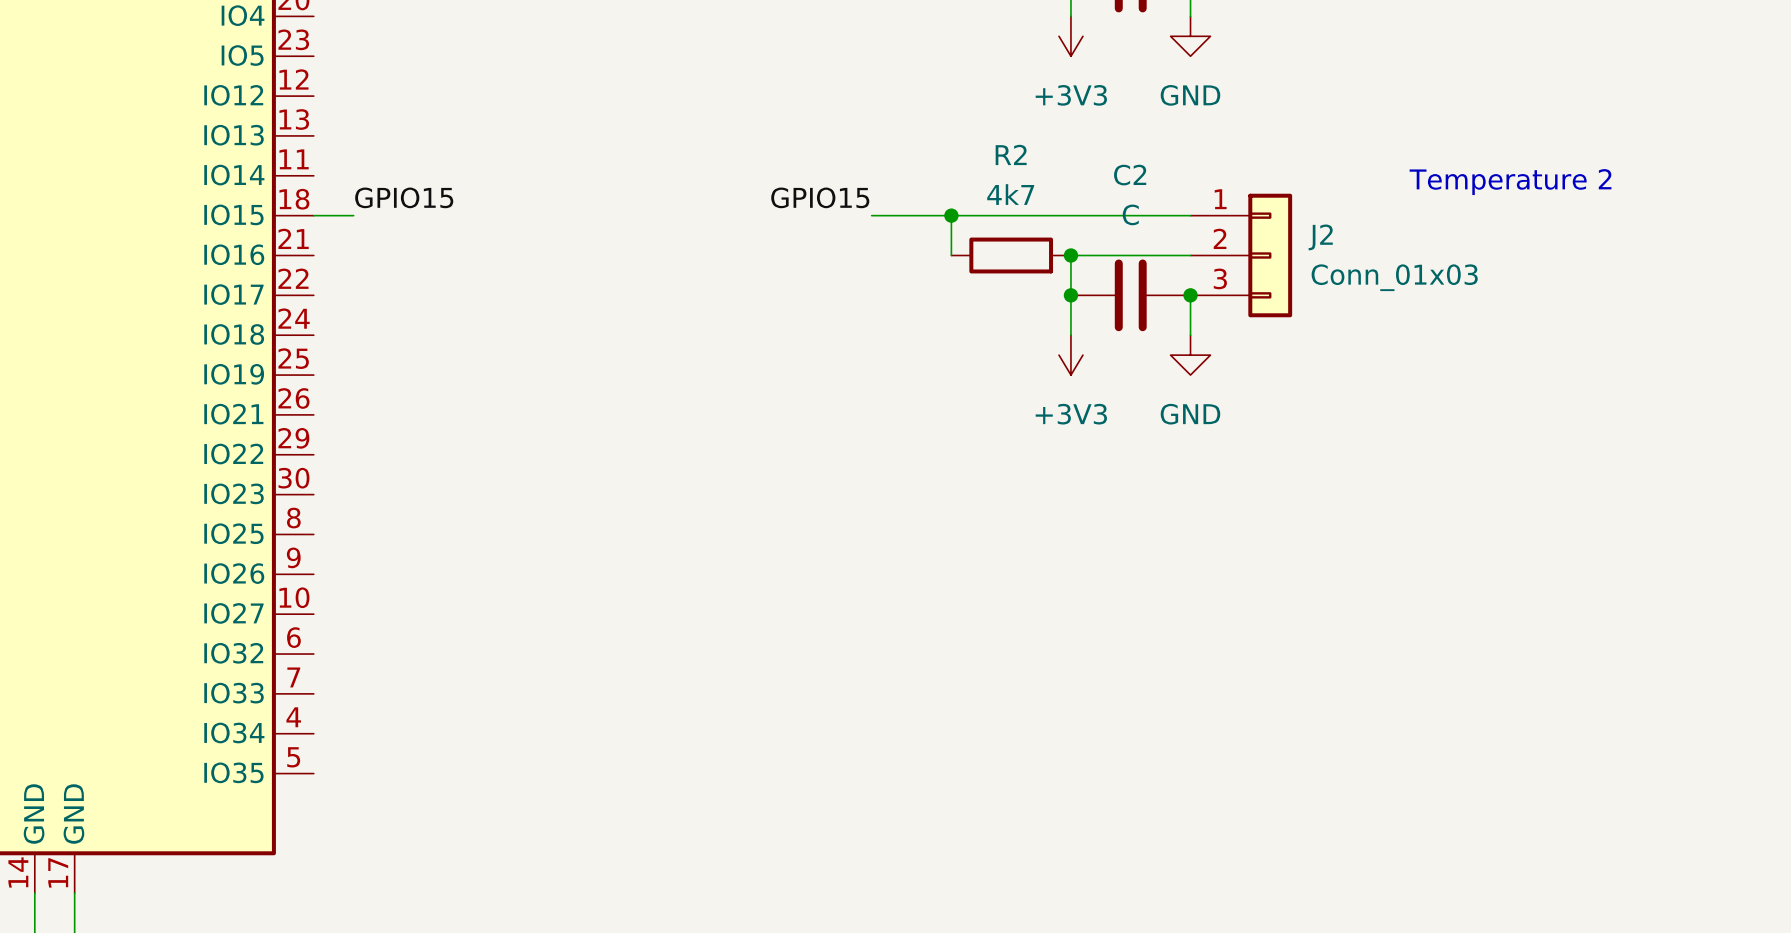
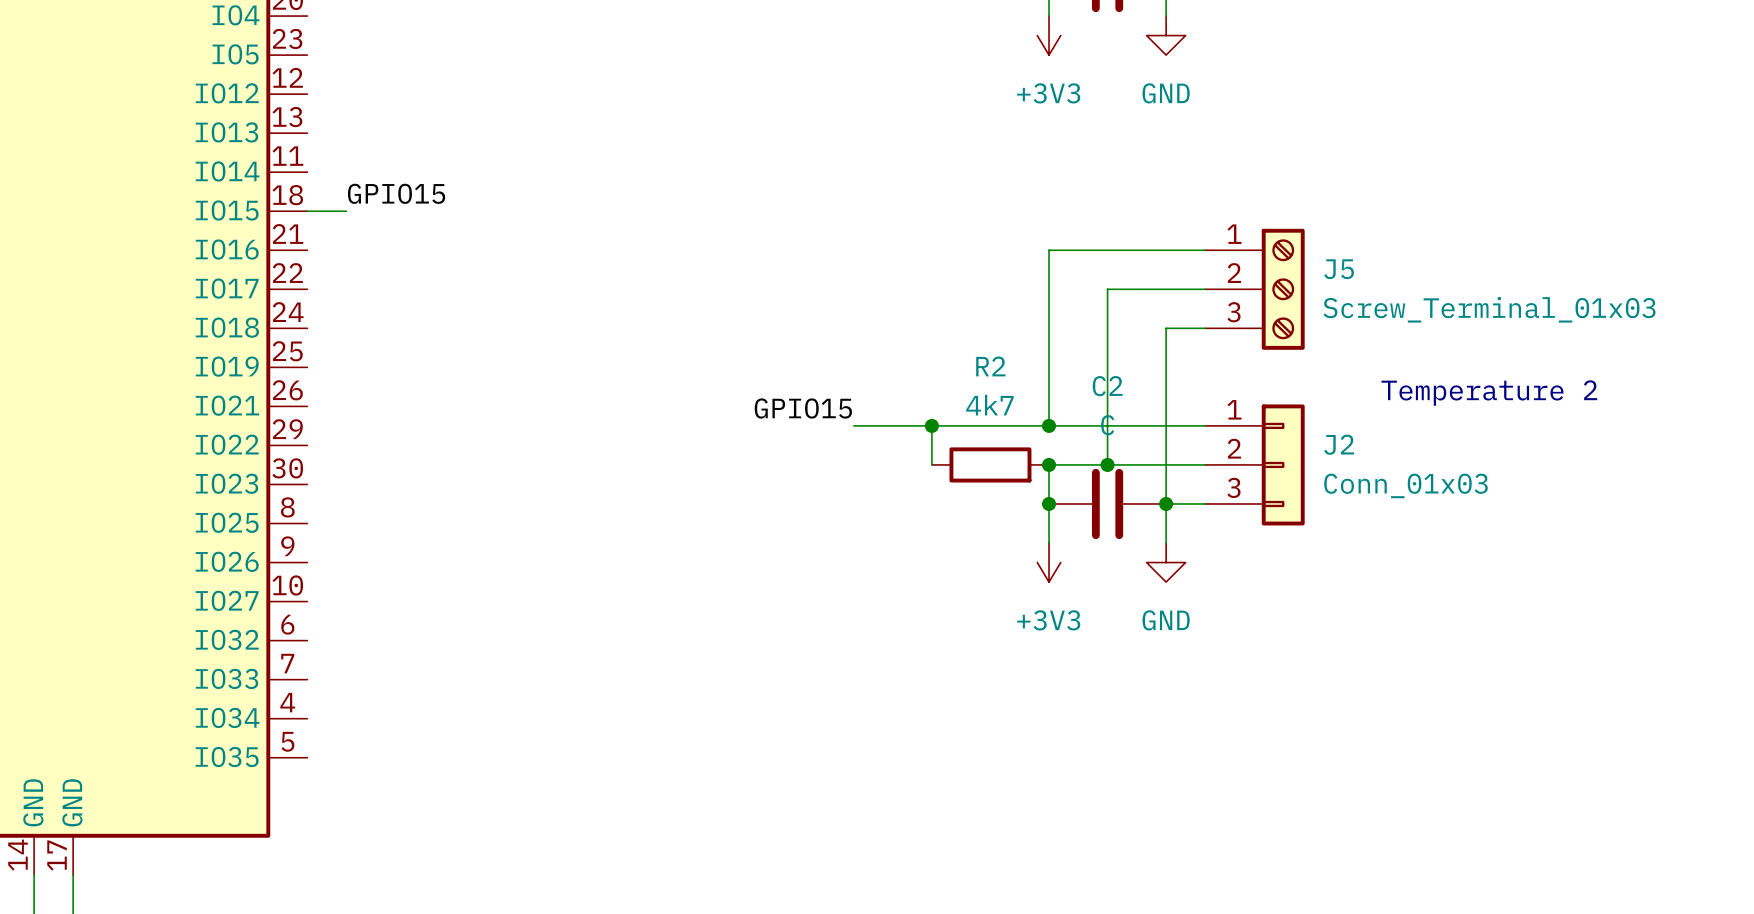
text position: Temperature 2 (1510, 182) -> Temperature 2 (1489, 393)
label position: GPIO15 (820, 197) -> GPIO15 (803, 408)
wire: (871, 215) (1190, 215) -> none
wire: (951, 215) (951, 255) -> (931, 425) (931, 464)
junction: (951, 215) -> none
R2 position: (1011, 255) -> (990, 464)
junction: (1070, 255) -> none
J2 position: (1241, 255) -> (1254, 464)
junction: (1070, 295) -> none
C2 position: (1130, 295) -> (1107, 503)
wire: (1190, 295) (1190, 335) -> none
junction: (1190, 295) -> none
wire: none -> (1205, 289) (1107, 289) (1107, 464)
J5: none -> Screw_Terminal_01x03 (1254, 289)
wire: none -> (1049, 328) (1049, 425)
wire: none -> (1205, 328) (1166, 328) (1166, 543)
power symbol position: +3V3 (1070, 355) -> +3V3 (1049, 562)
power symbol position: GND (1190, 355) -> GND (1166, 562)
wire: none -> (853, 425) (1205, 425)
junction: none -> (931, 425)
junction: none -> (1049, 425)
junction: none -> (1049, 464)
junction: none -> (1107, 464)
wire: none -> (1205, 464) (1049, 464) (1049, 543)
junction: none -> (1049, 503)
wire: none -> (1166, 503) (1205, 503)
junction: none -> (1166, 503)

